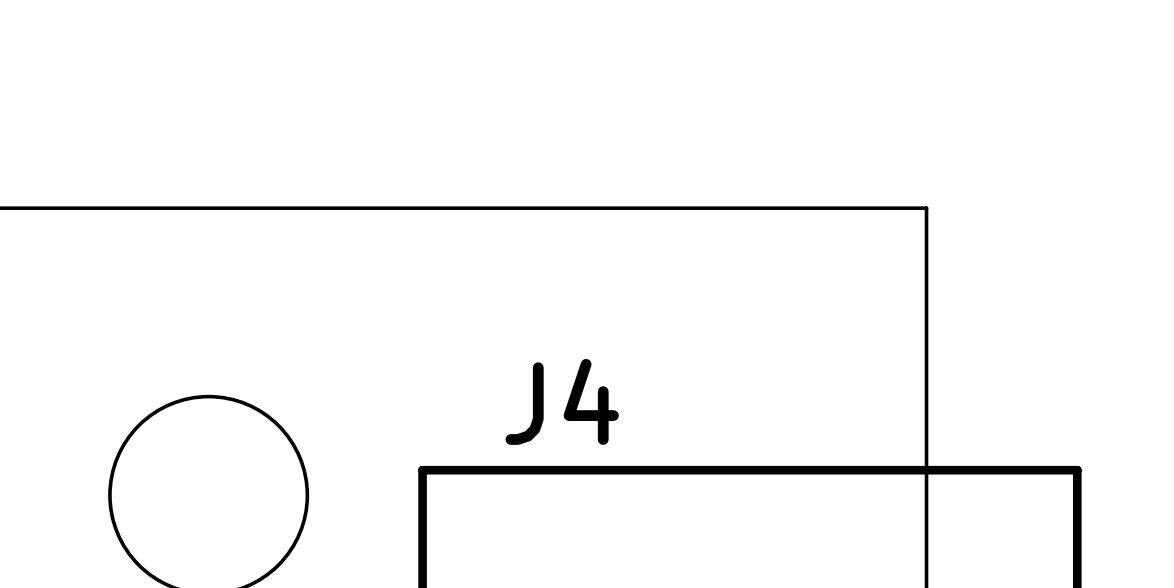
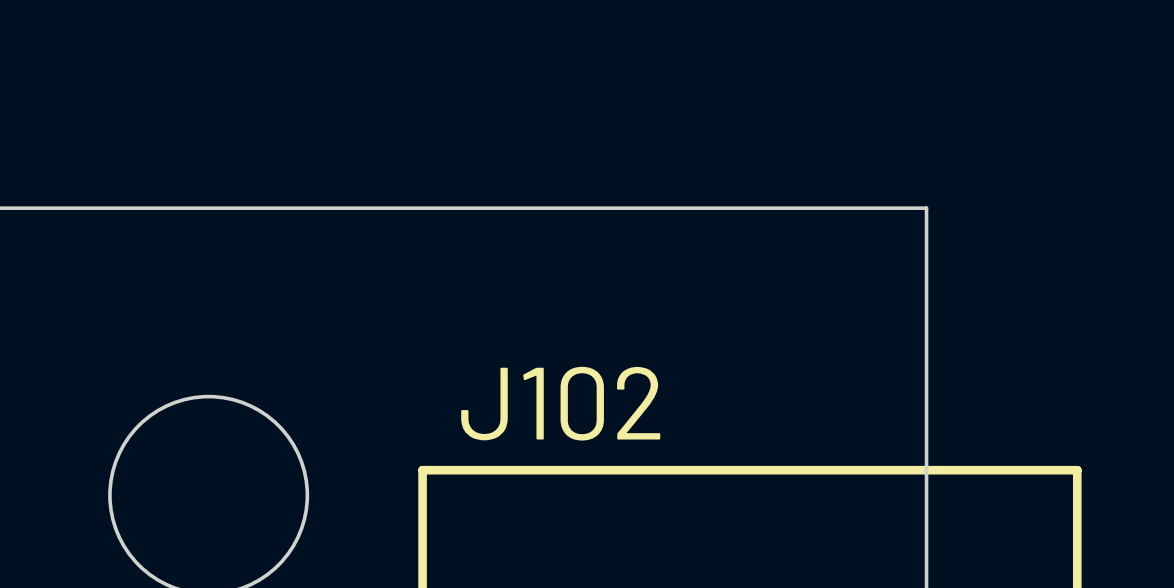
J4 name: J4 (562, 401) -> J102 (560, 403)

